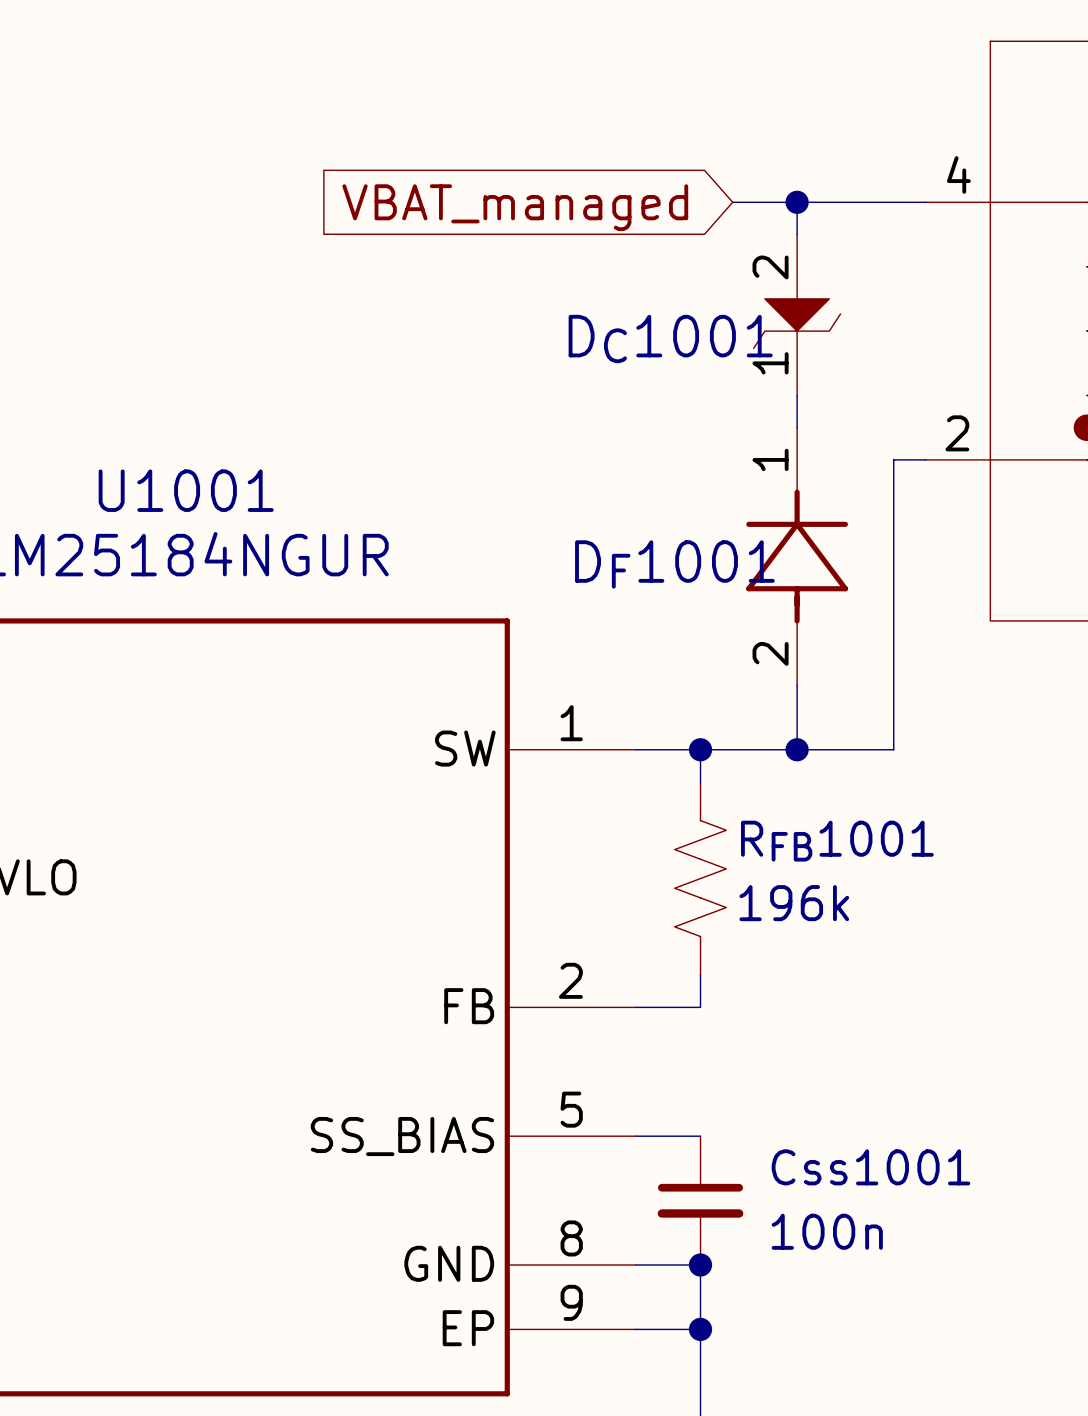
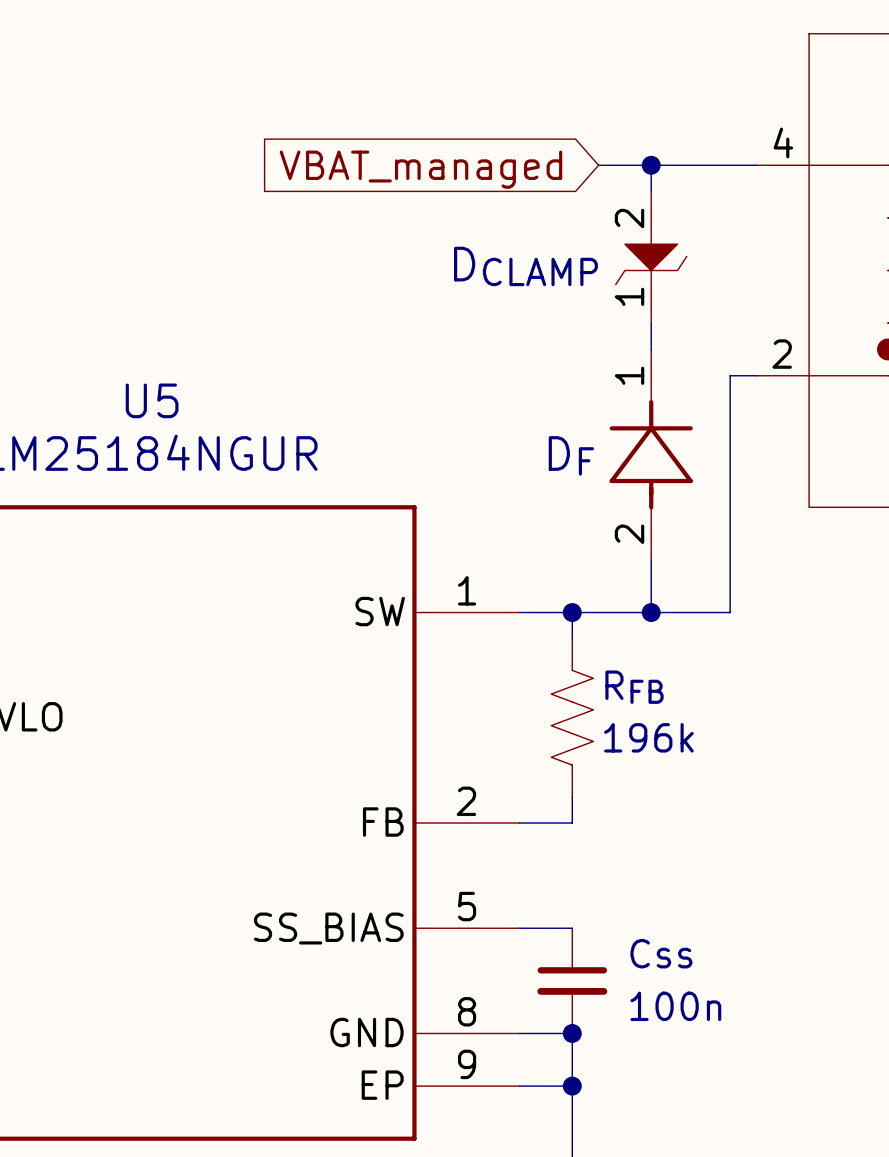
DC1001 name: DC1001 (670, 339) -> DCLAMP (525, 266)
U1001 name: U1001 (186, 490) -> U5 (152, 400)
DF1001 name: DF1001 (674, 564) -> DF (571, 455)
RFB1001 name: RFB1001 (837, 841) -> RFB (634, 687)
Css1001 name: Css1001 (870, 1167) -> Css (661, 953)

